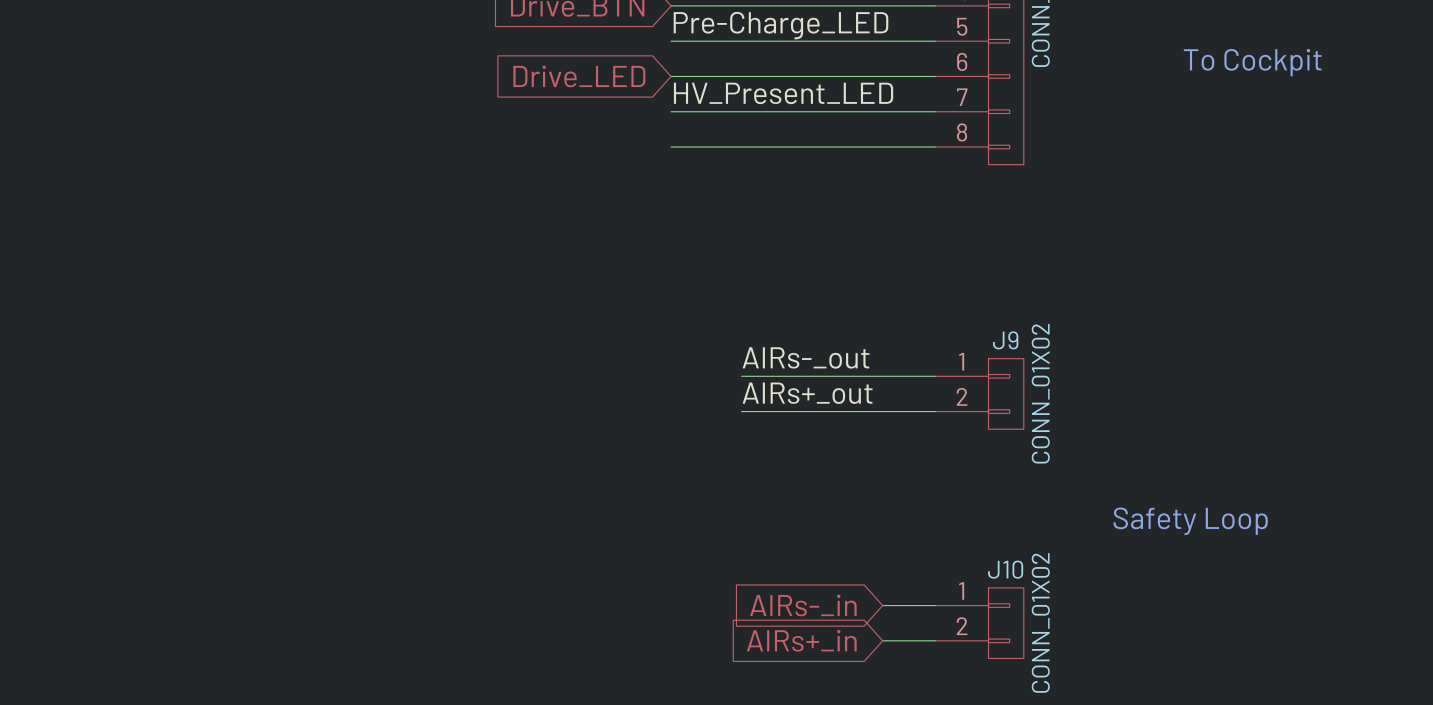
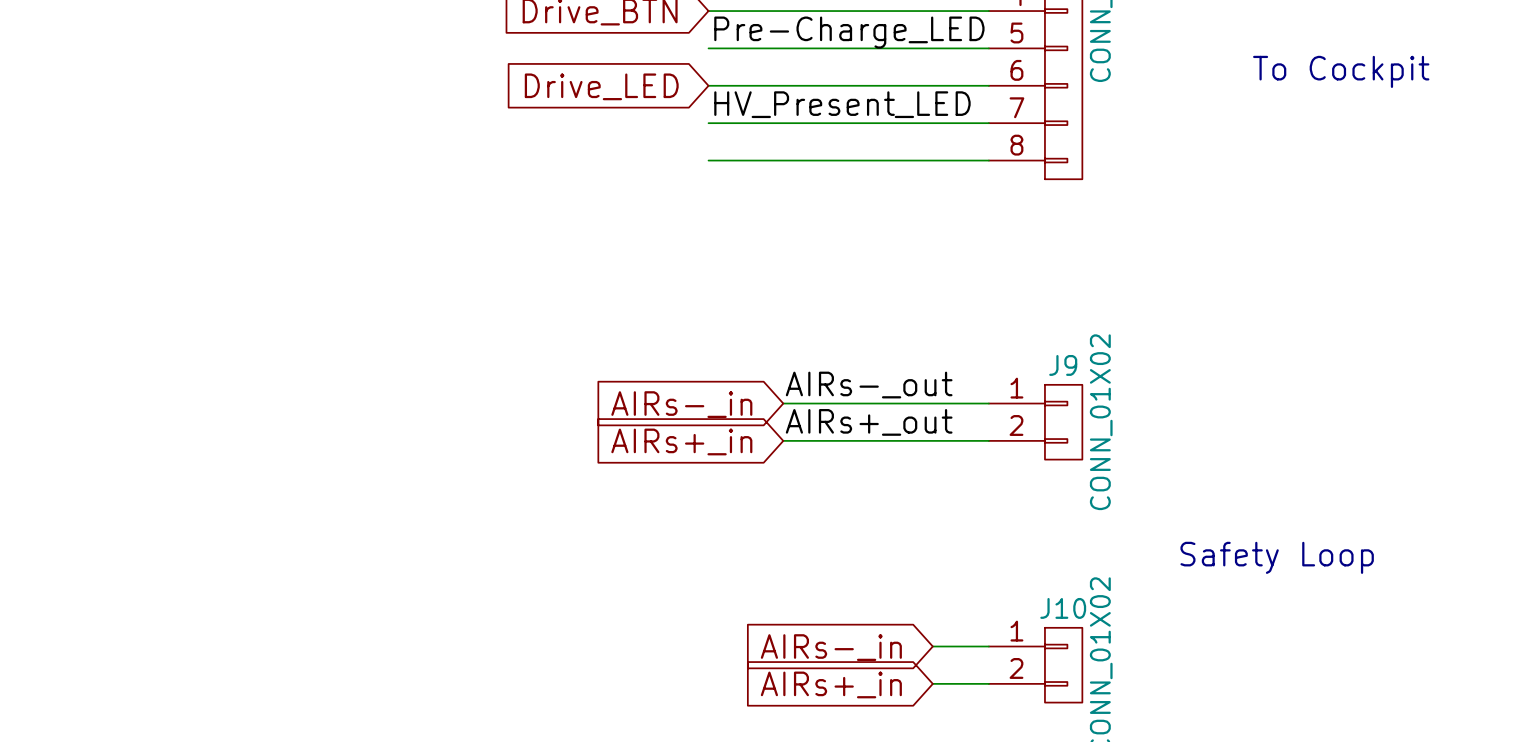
global label: none -> AIRs-_in (681, 404)
global label: none -> AIRs+_in (681, 441)

